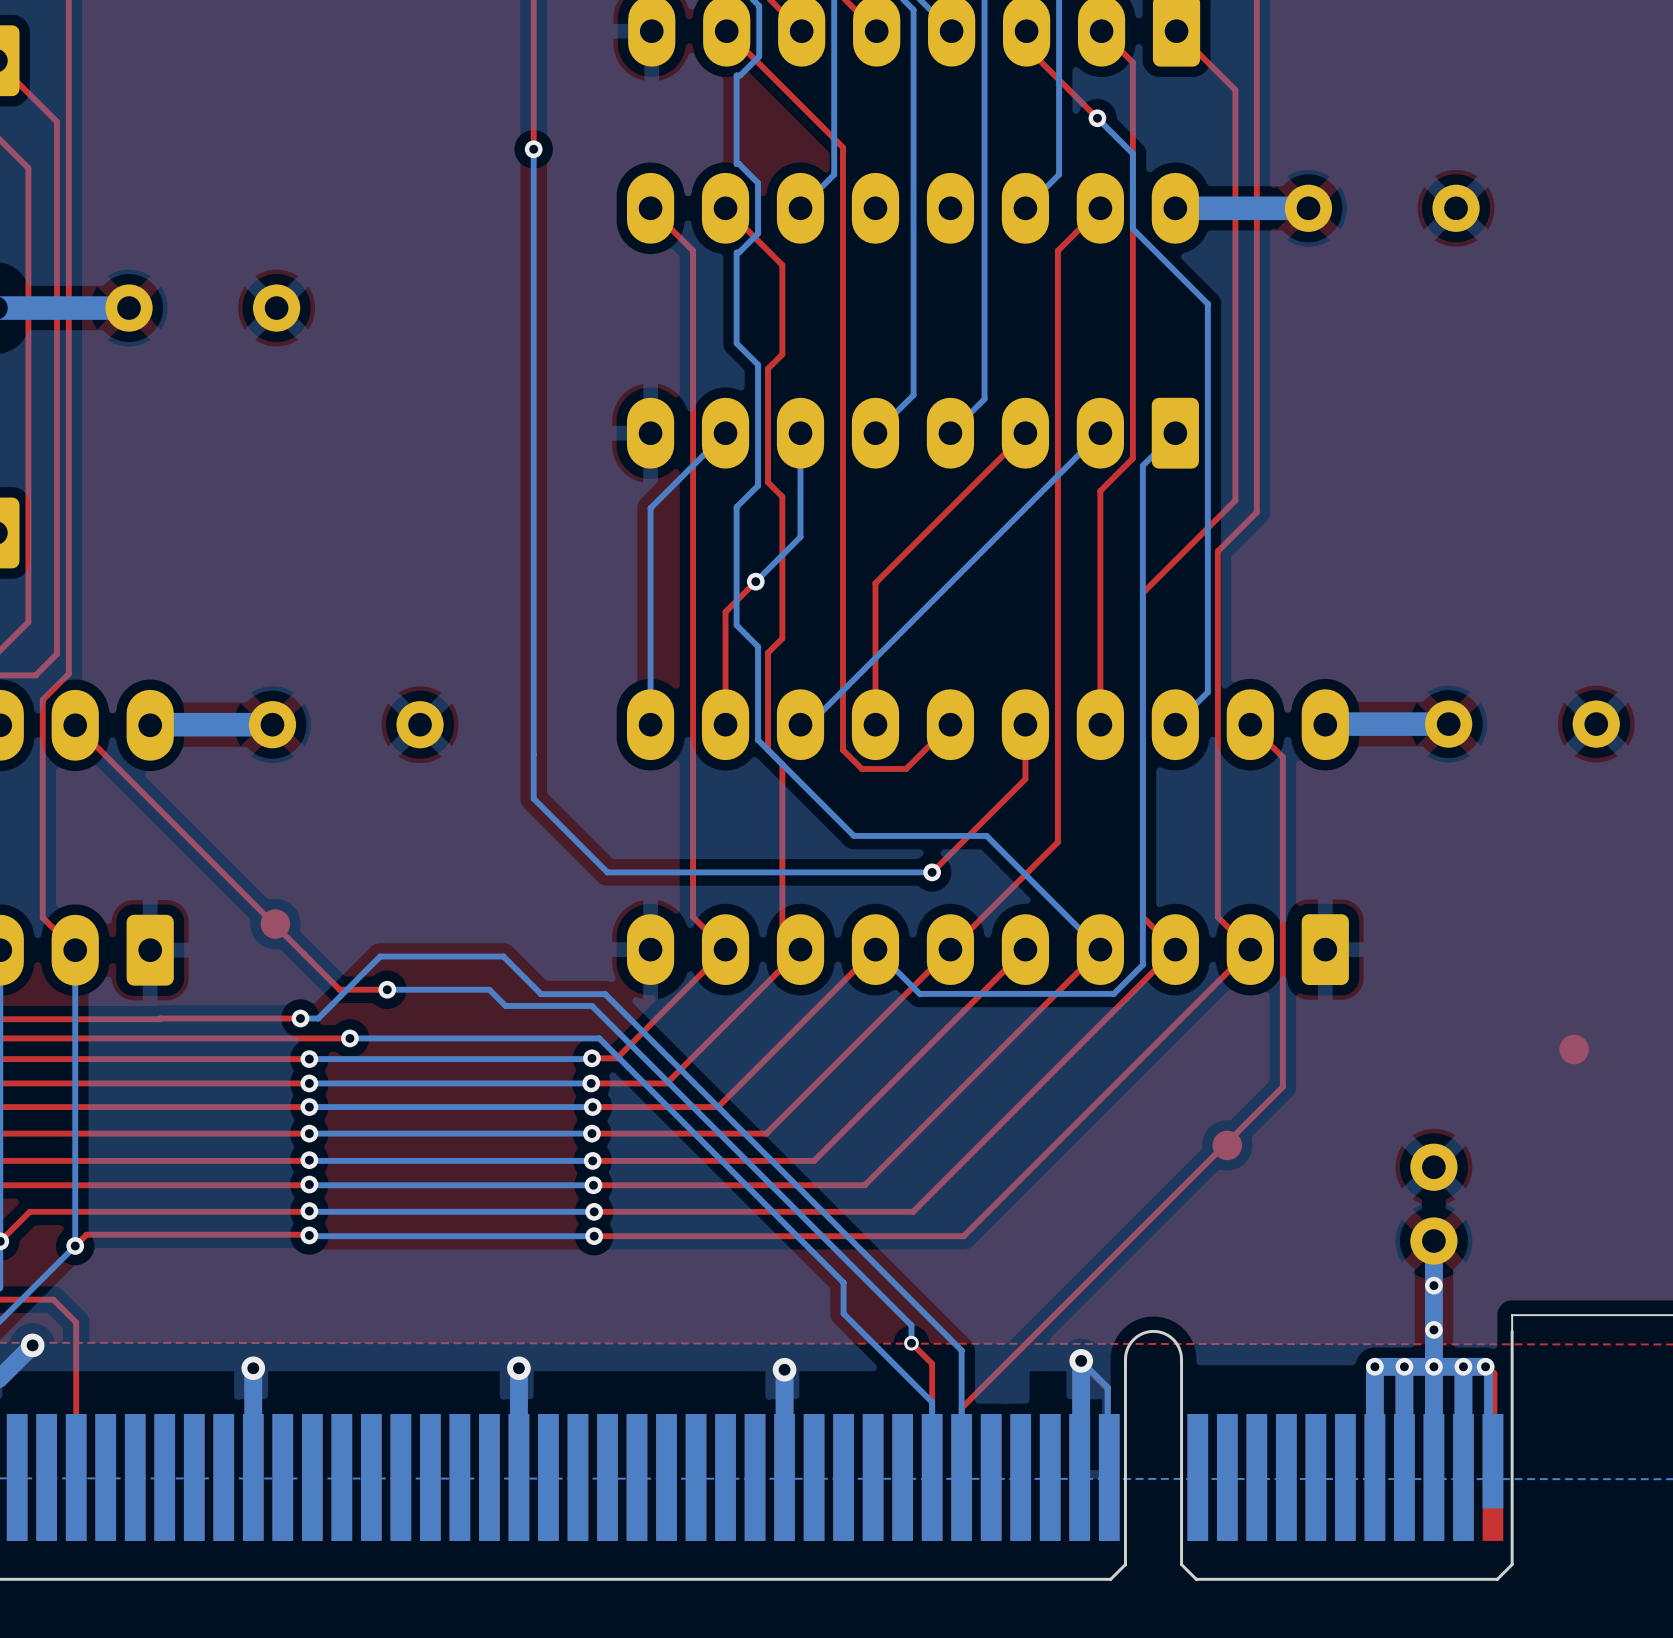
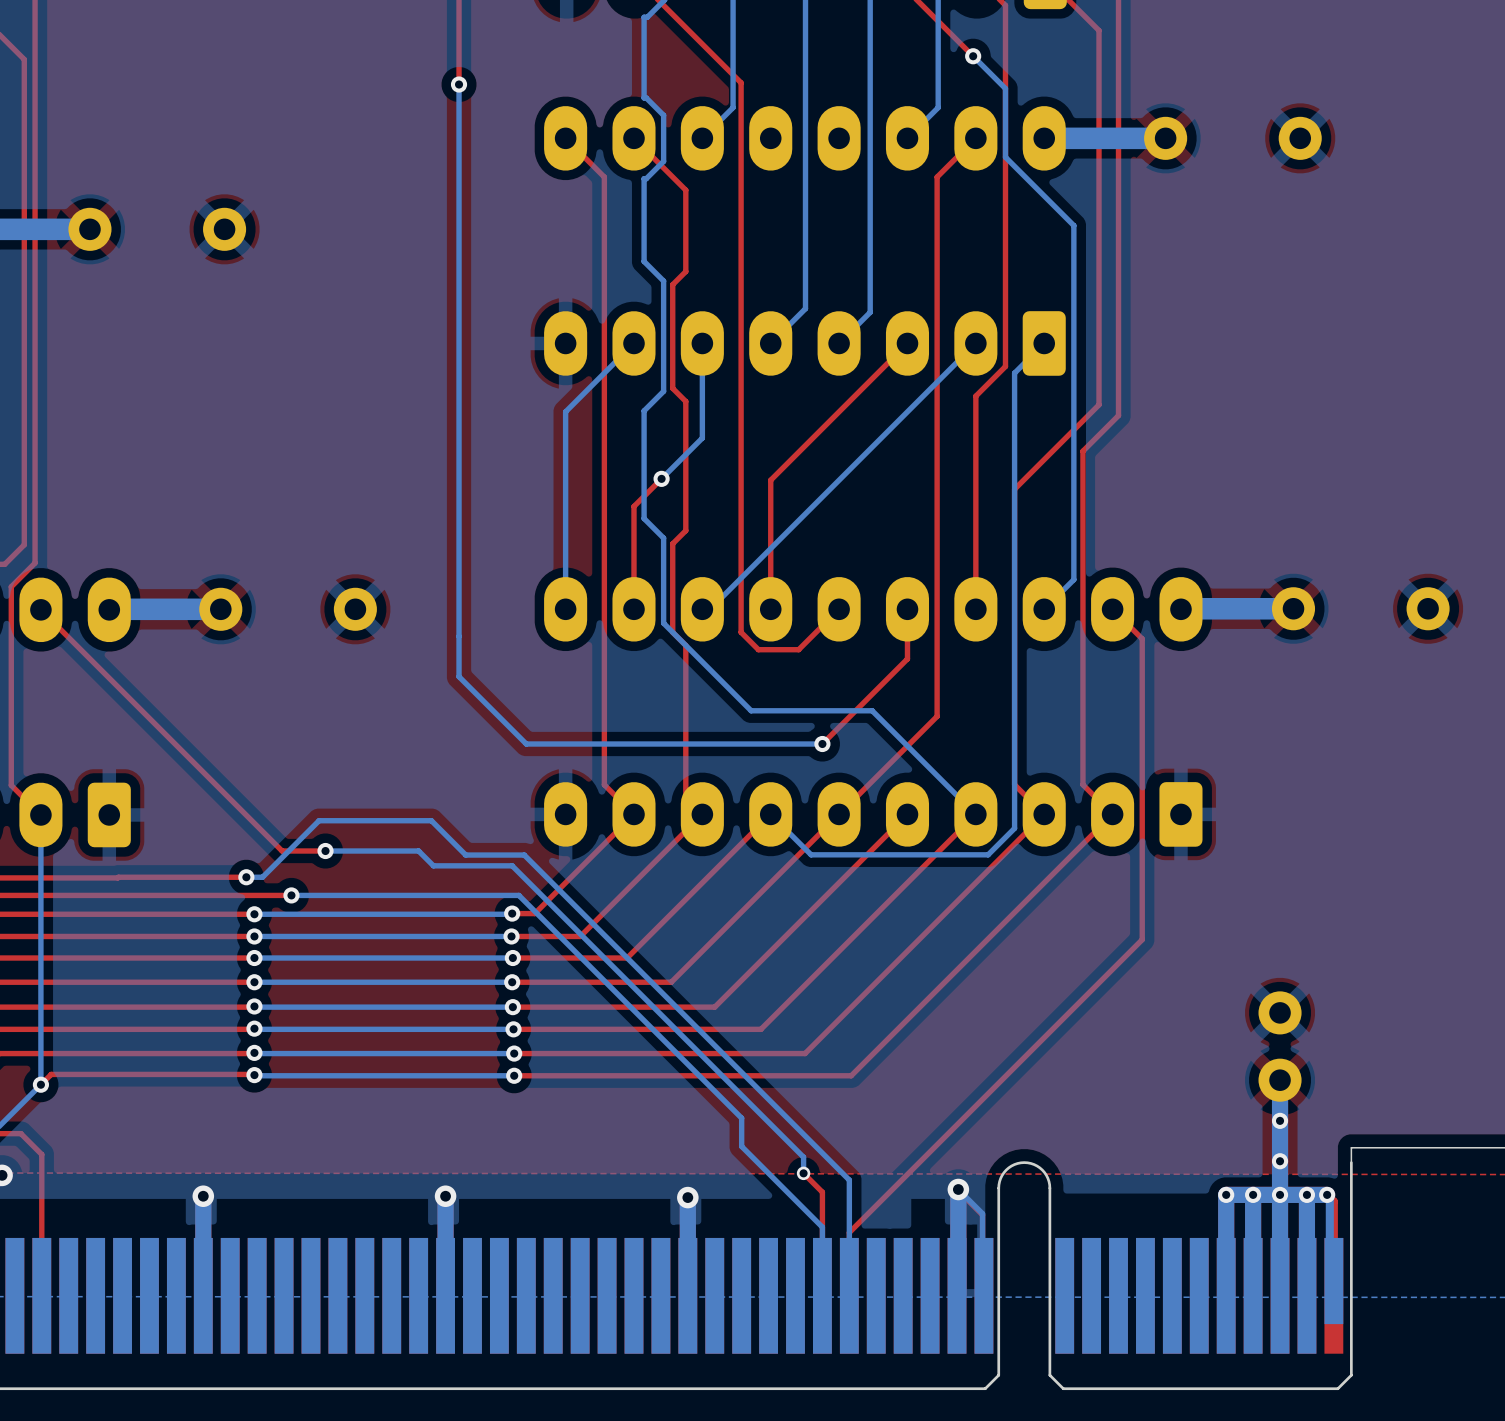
part: (275, 924) -> none
part: (1574, 1049) -> none
part: (1227, 1145) -> none

